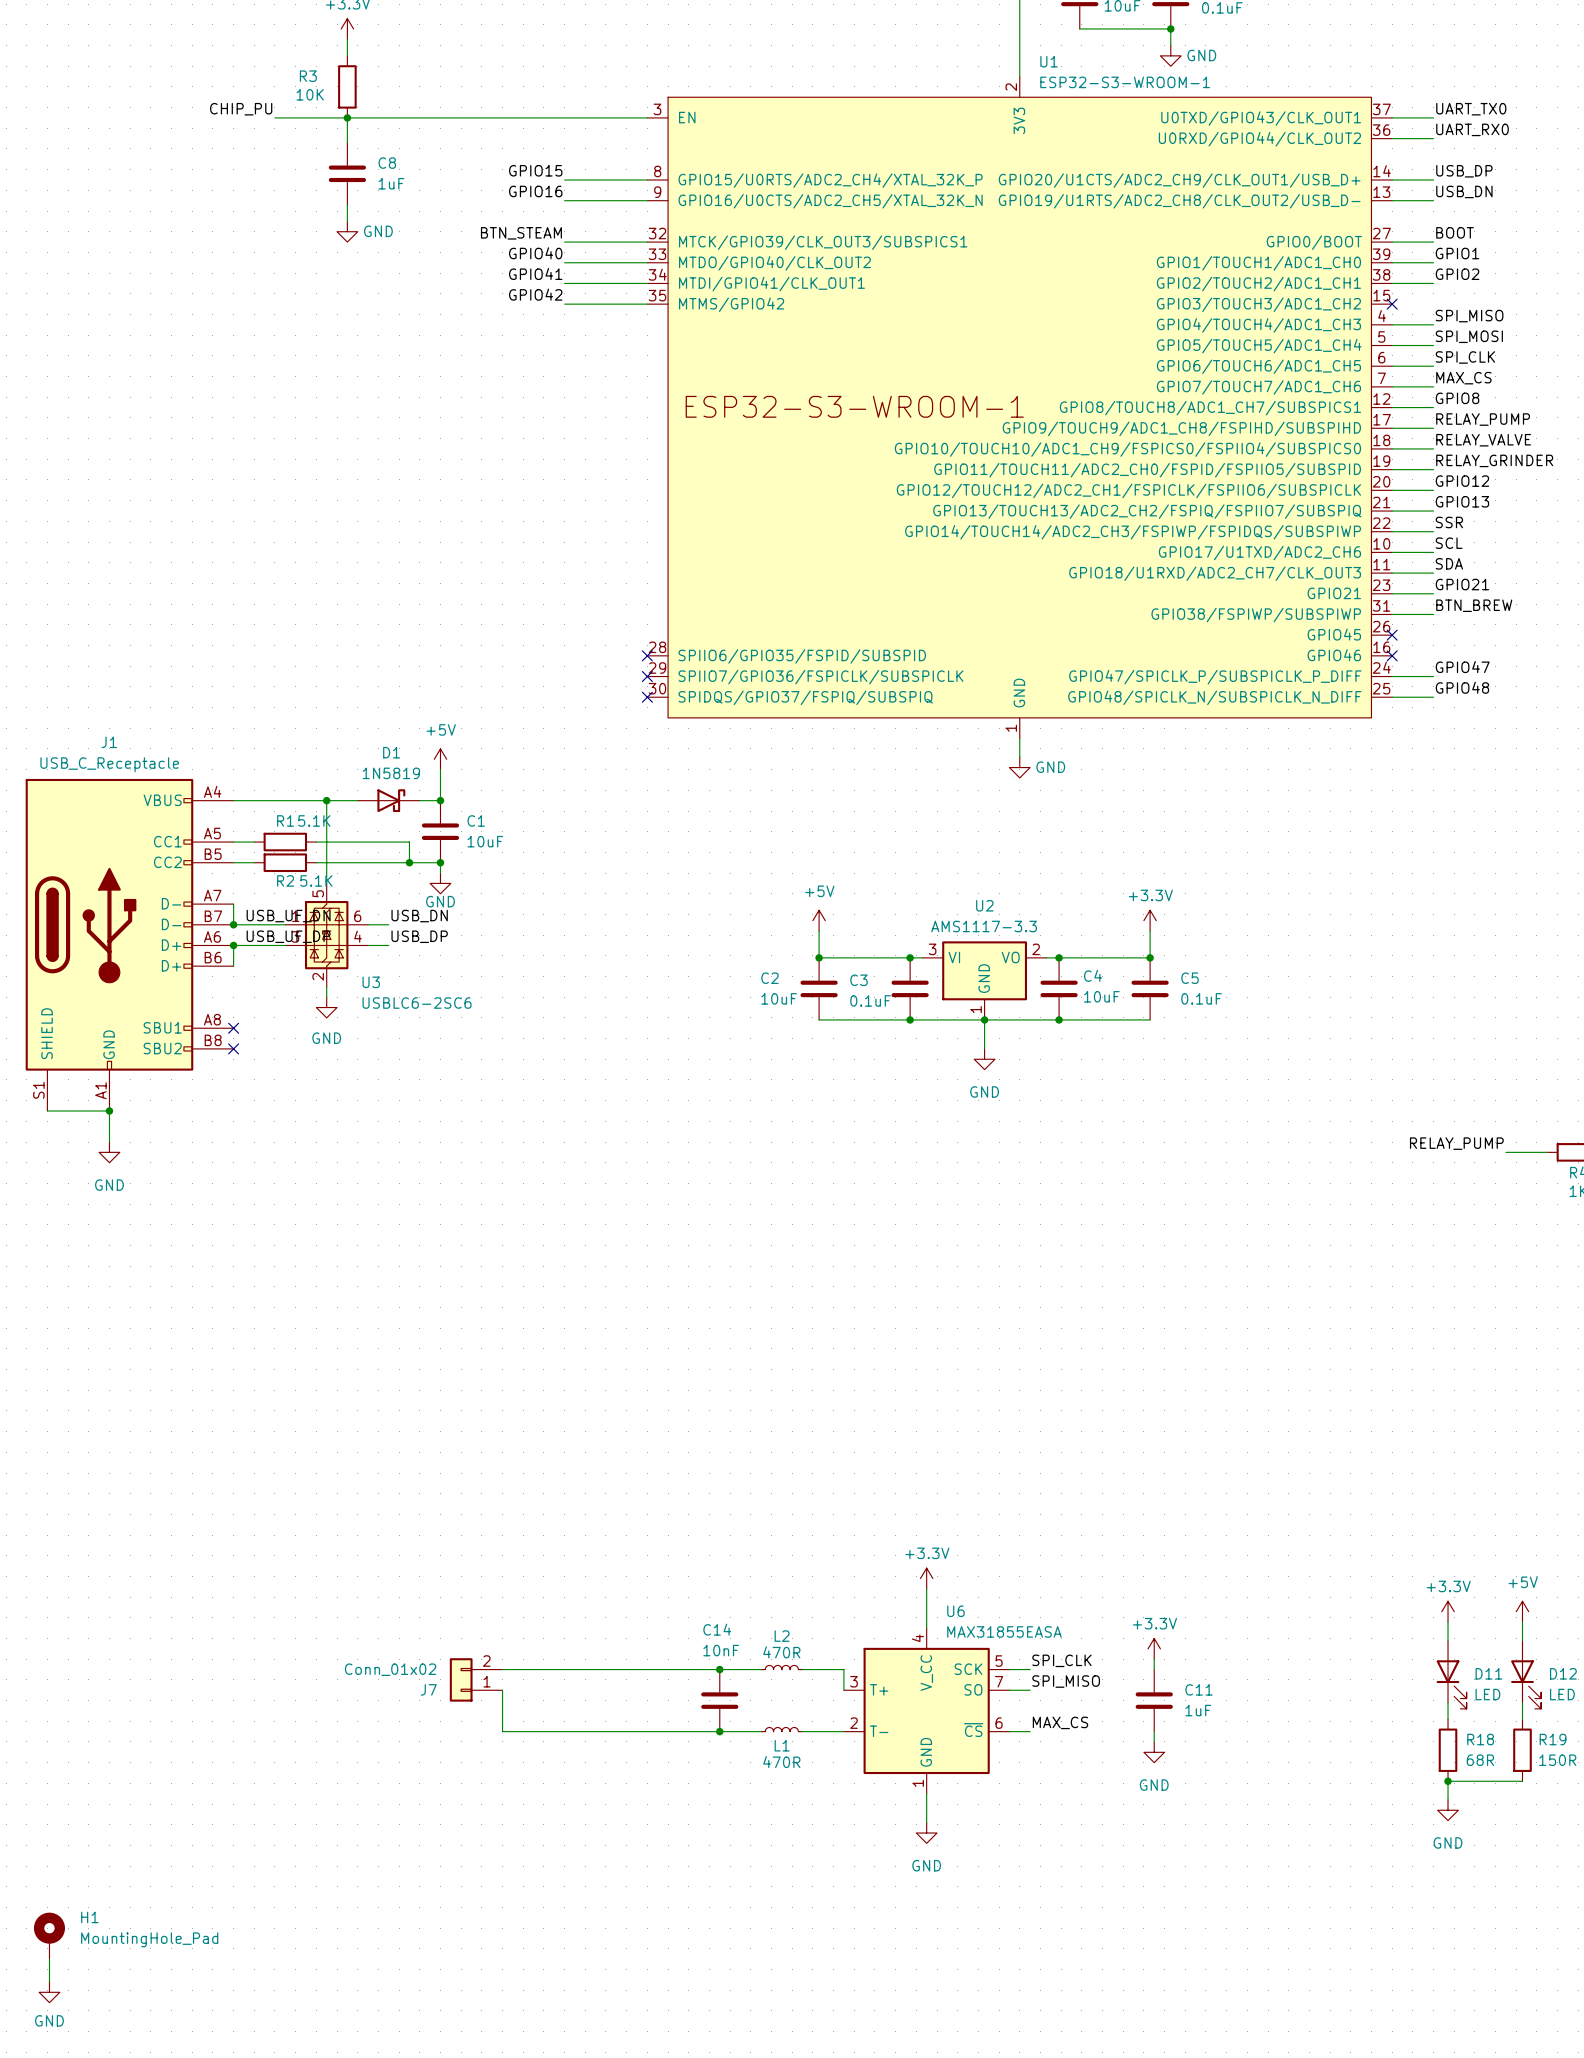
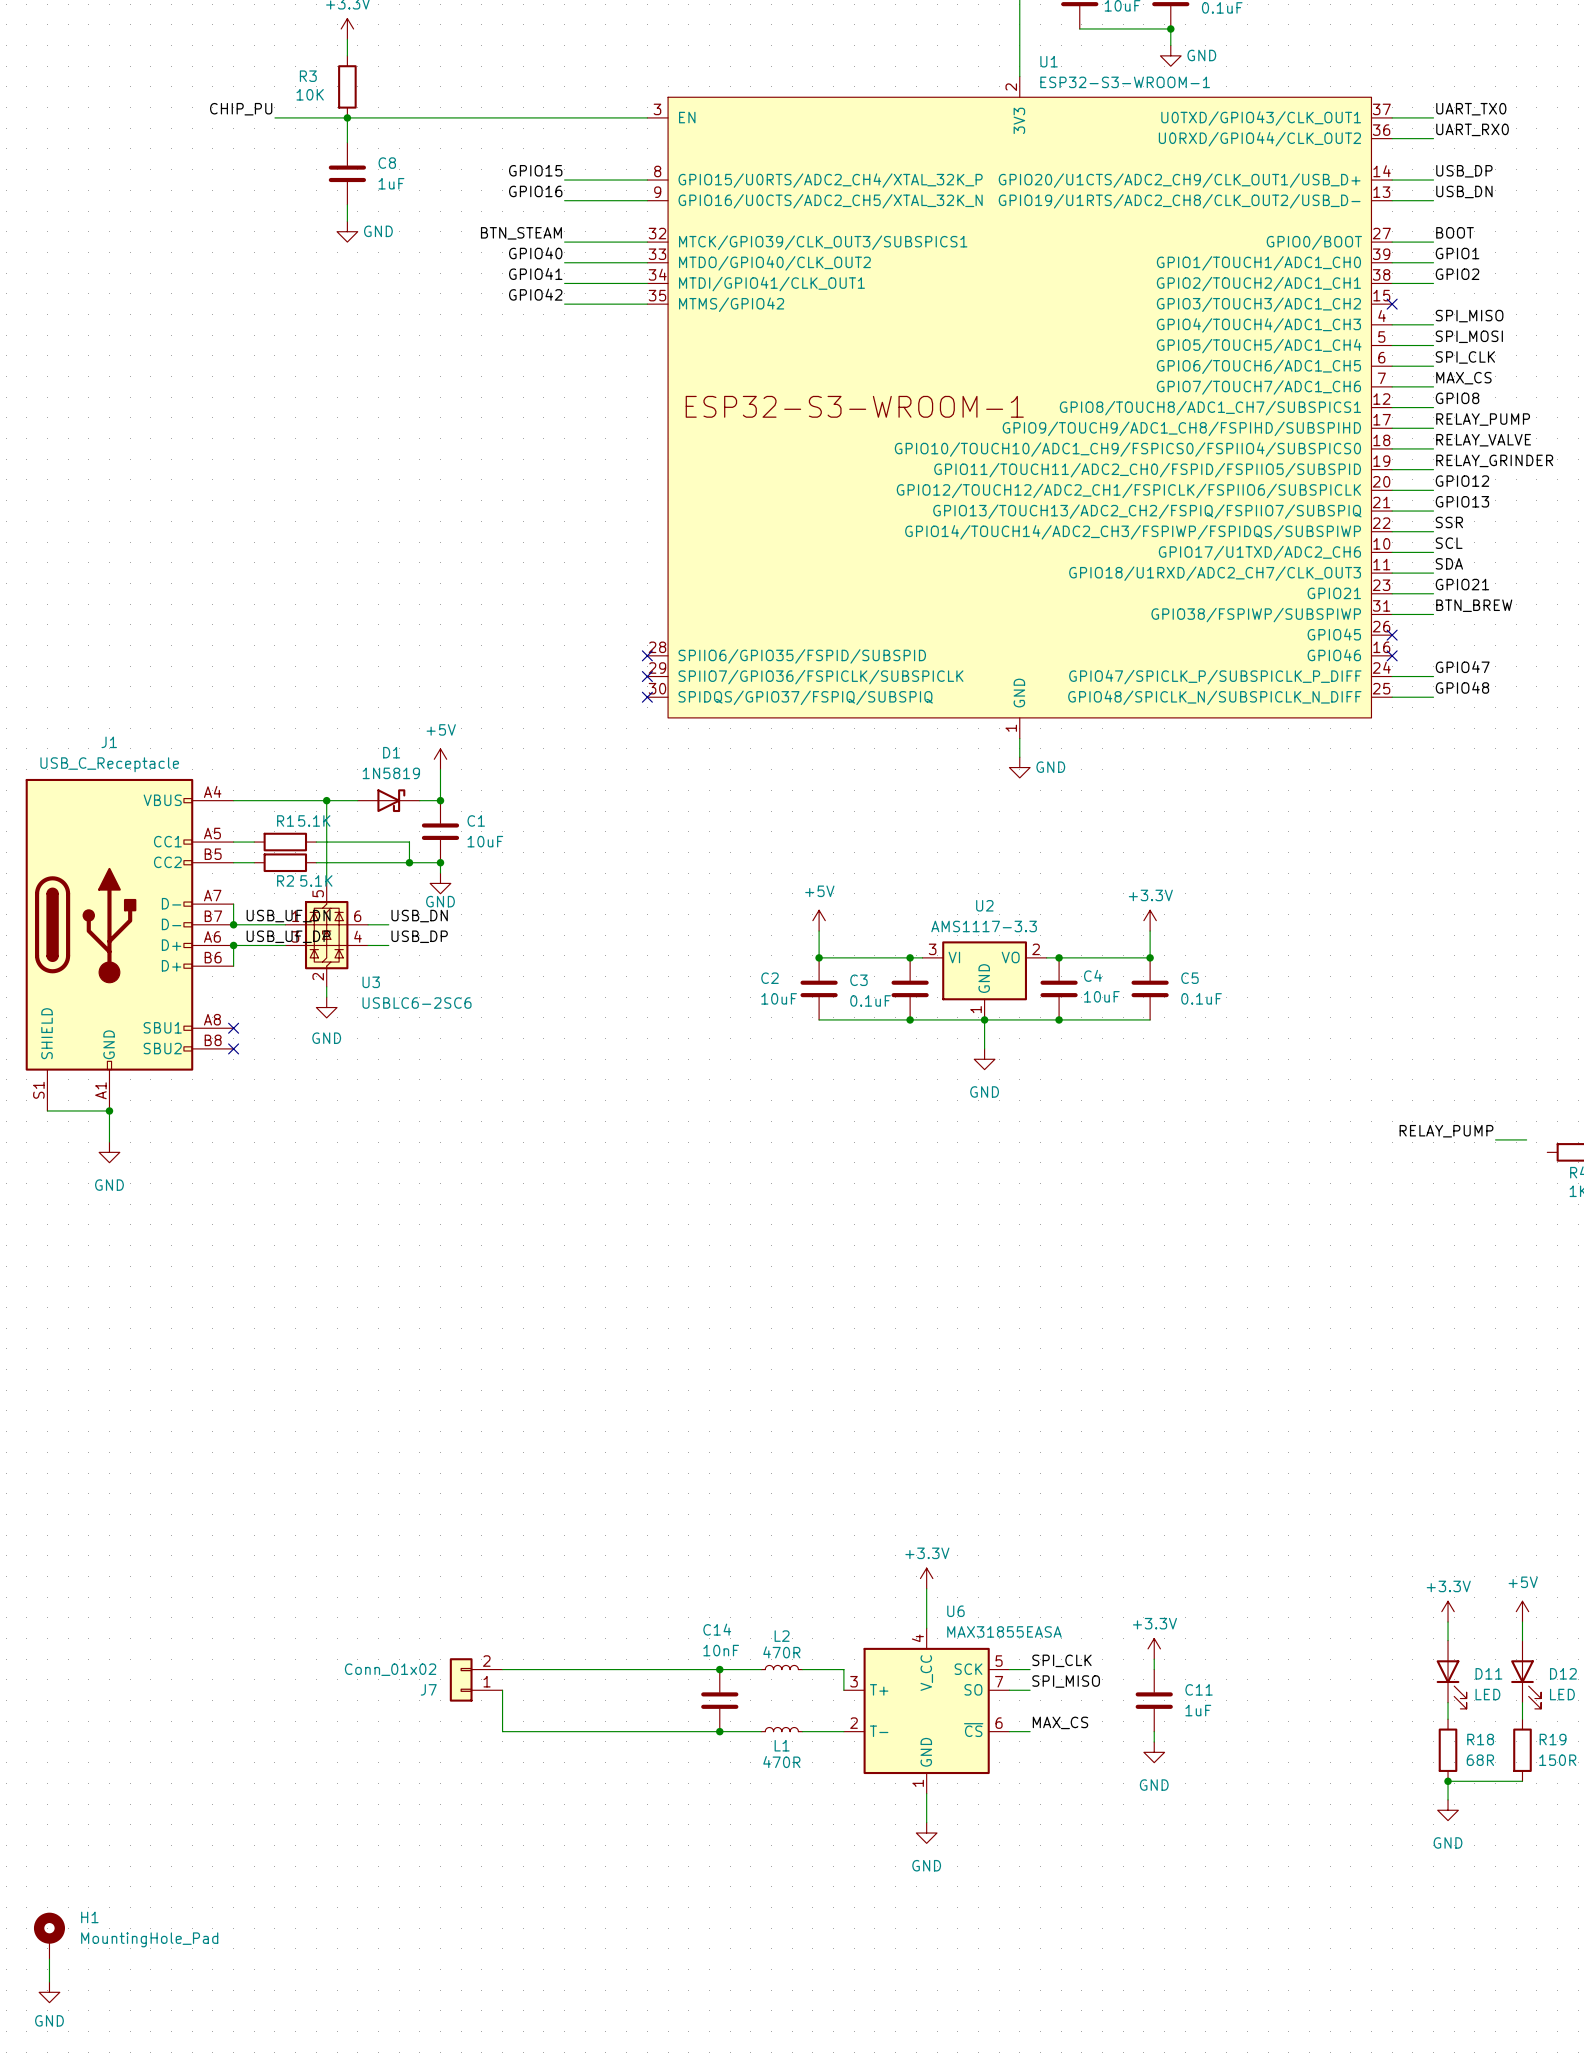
wire: none -> (1495, 1139) (1526, 1139)
label position: RELAY_PUMP (1456, 1143) -> RELAY_PUMP (1446, 1131)
wire: (1505, 1152) (1547, 1152) -> none

